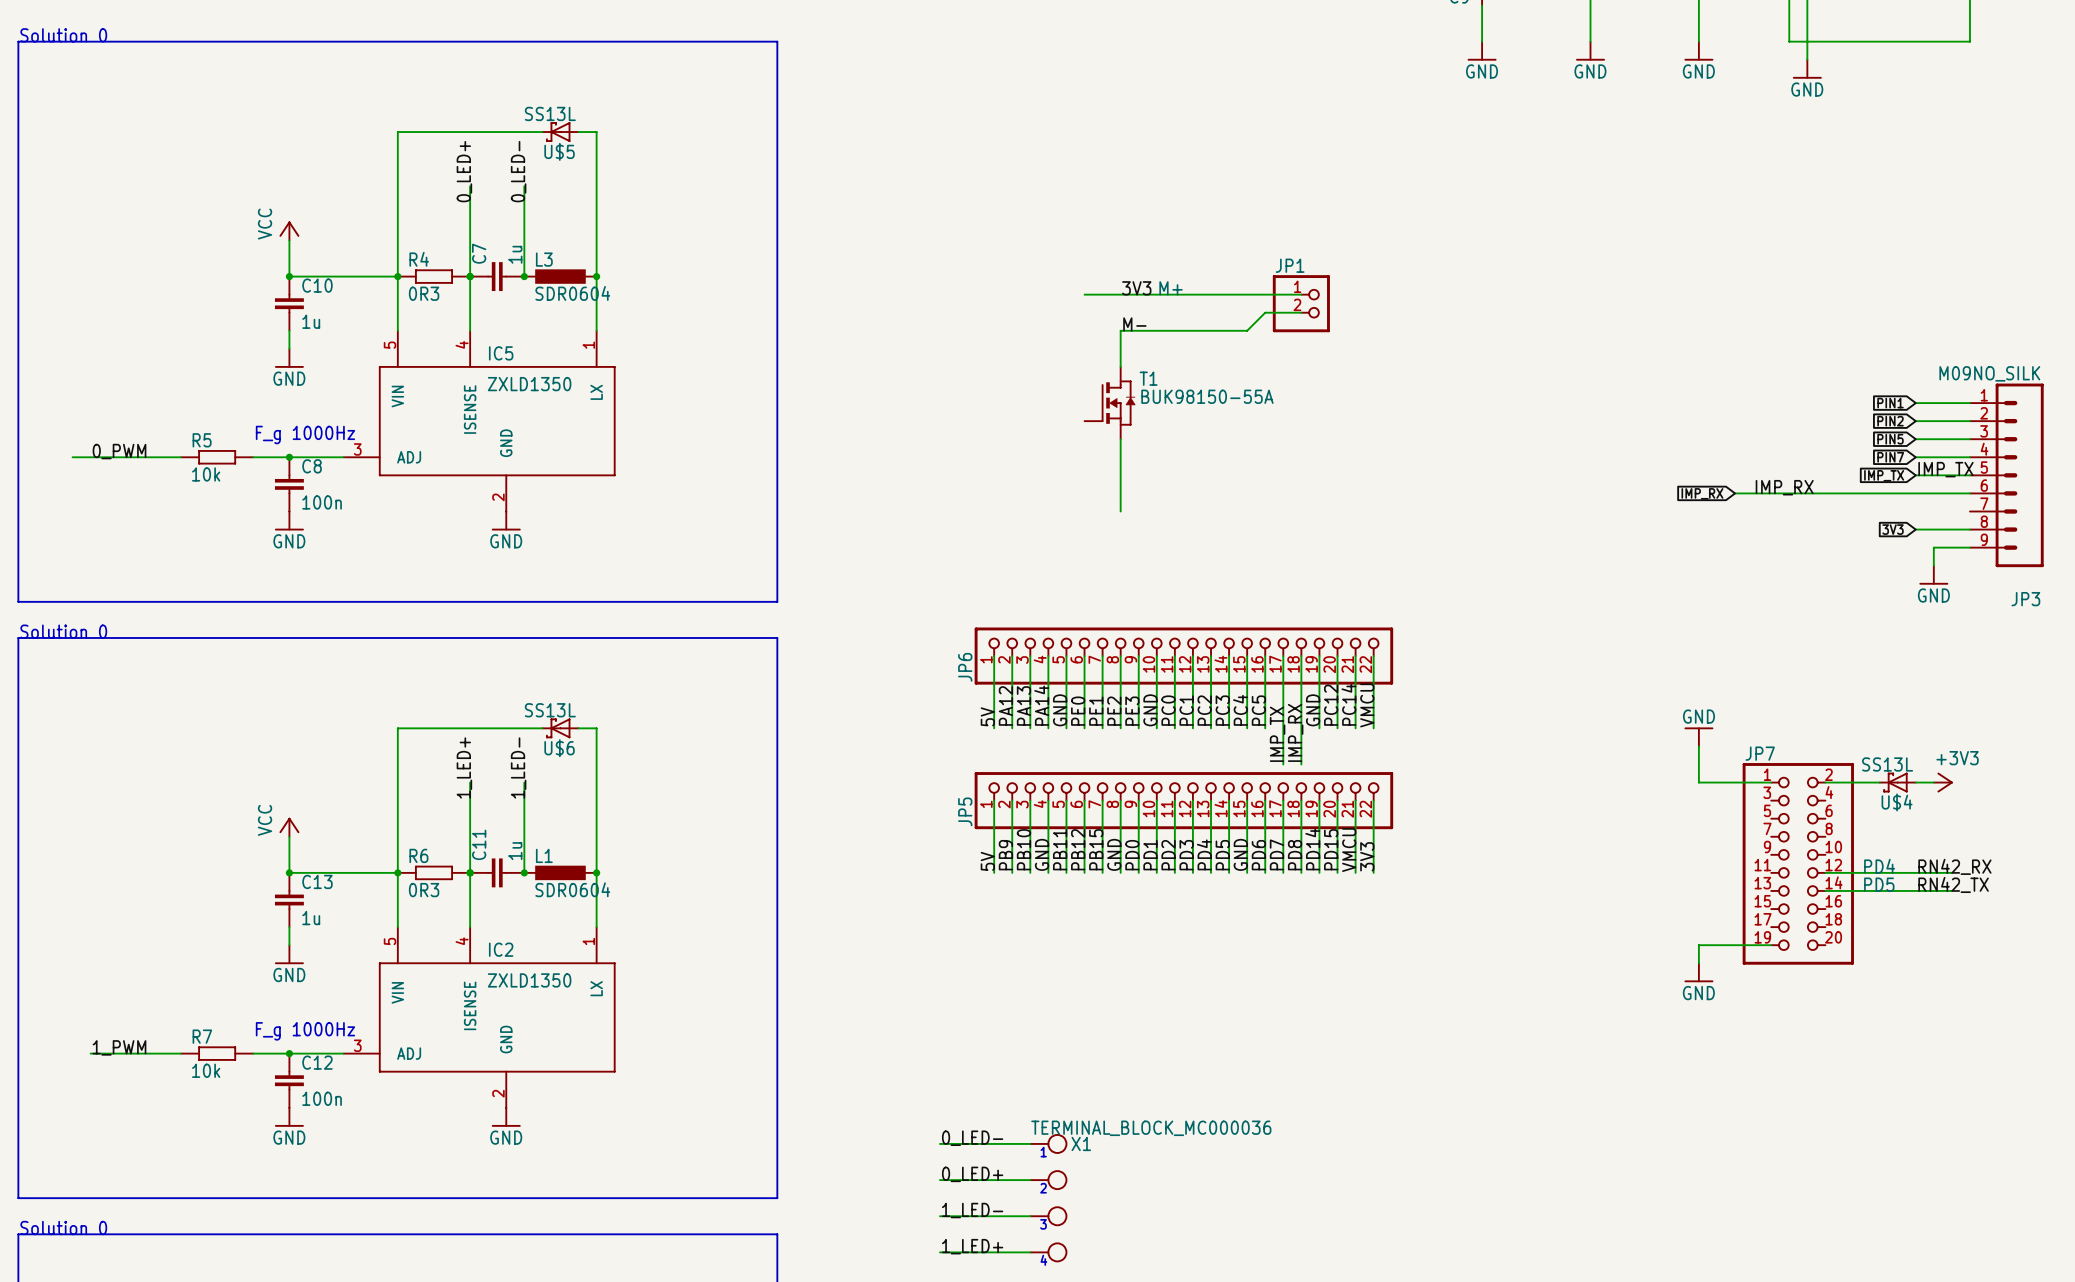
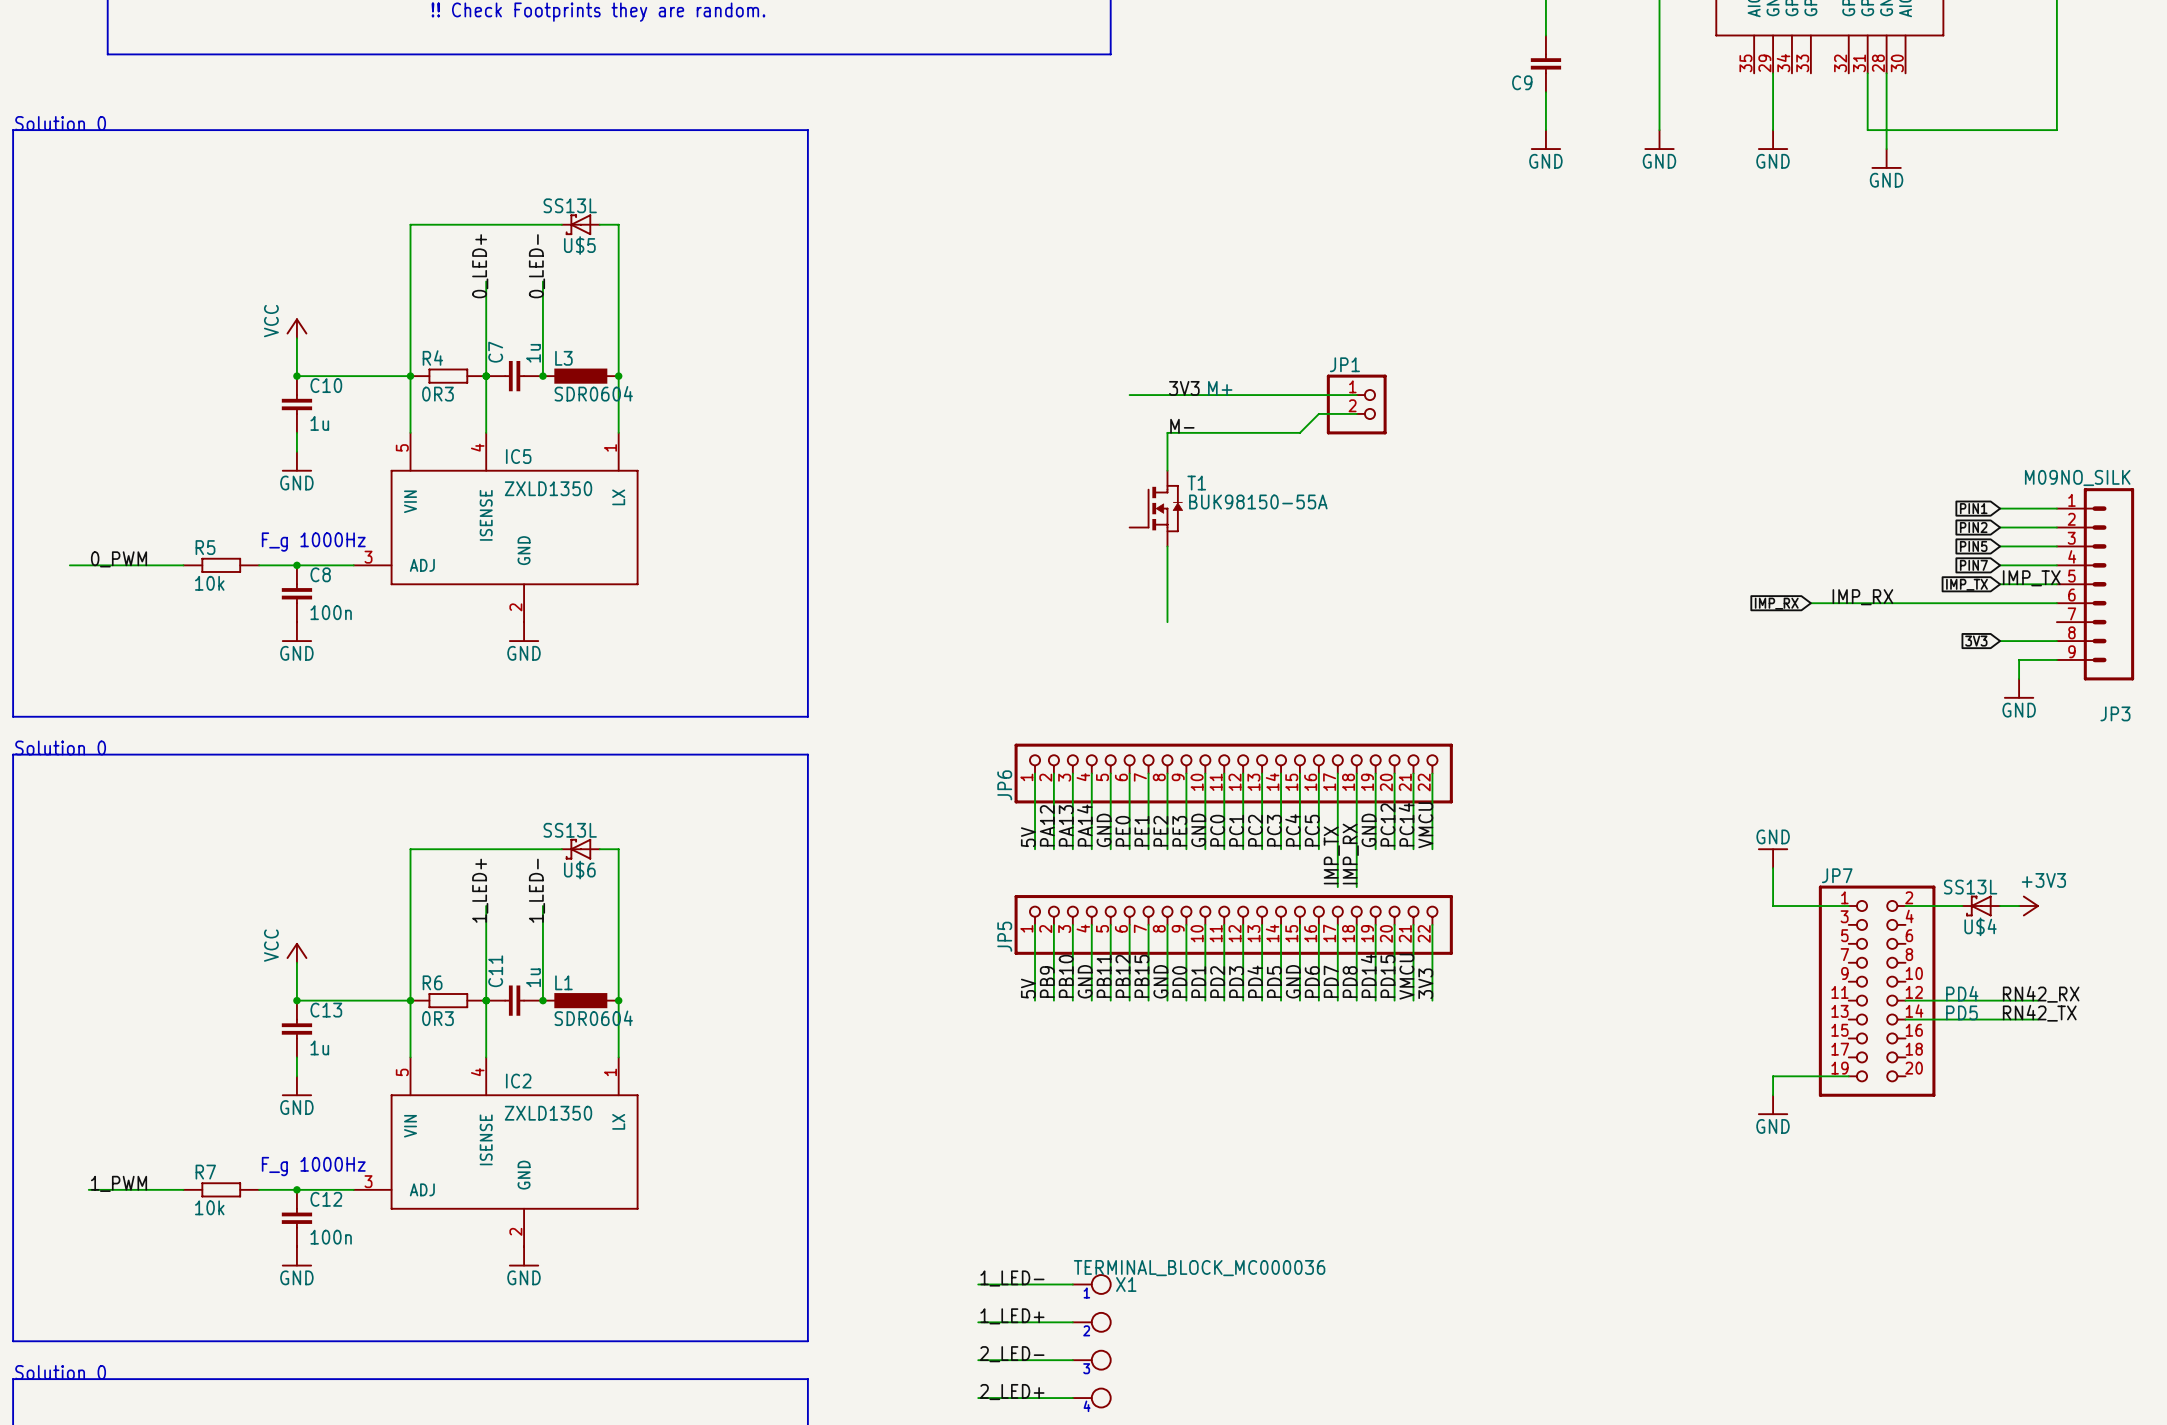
label: 0_LED- (972, 1138) -> 1_LED- (1012, 1278)
label: 0_LED+ (972, 1174) -> 1_LED+ (1012, 1316)
label: 1_LED- (972, 1210) -> 2_LED- (1012, 1354)
label: 1_LED+ (972, 1246) -> 2_LED+ (1012, 1392)

